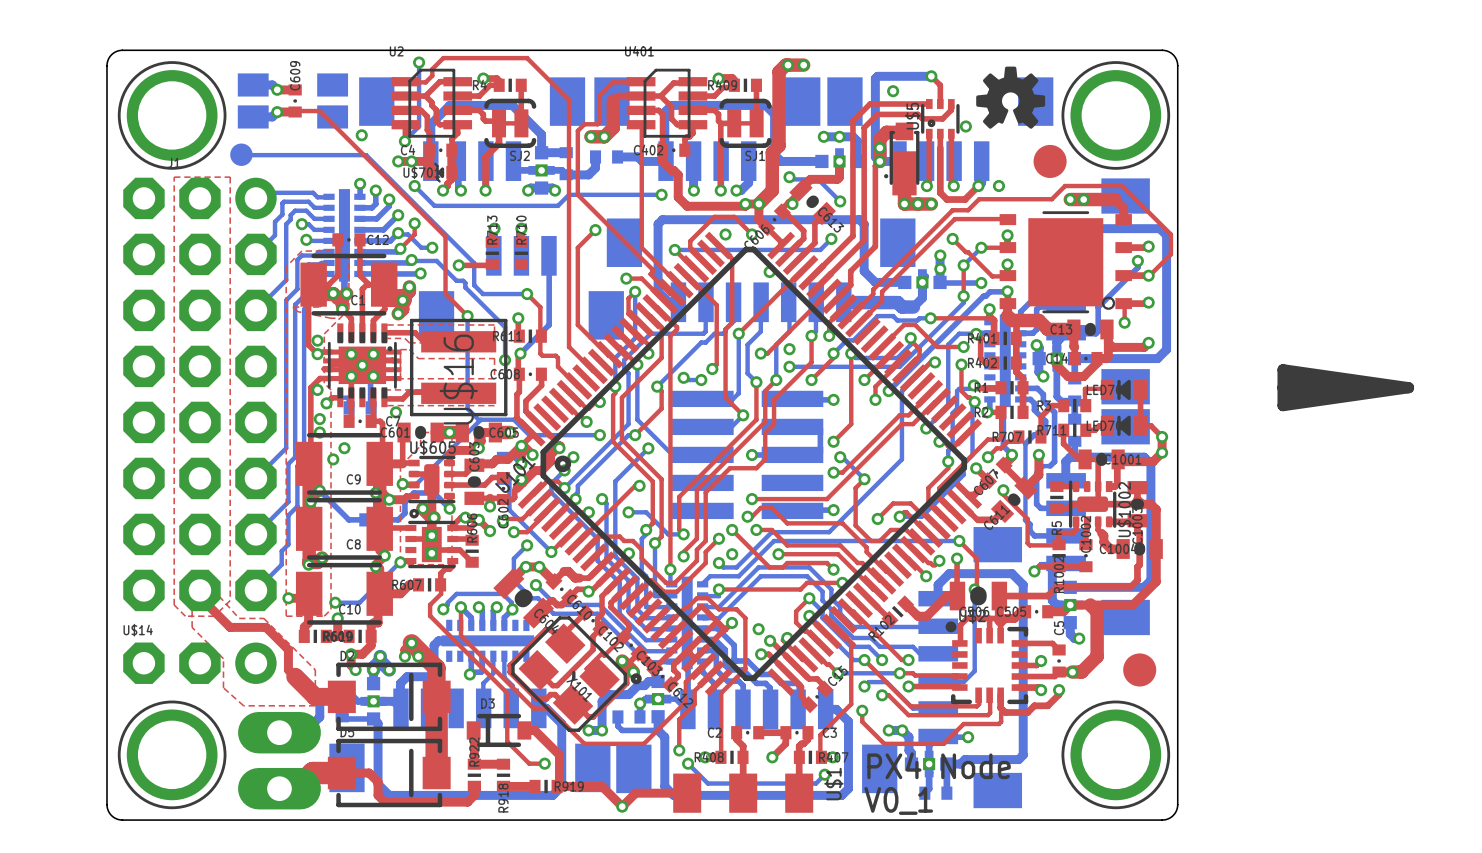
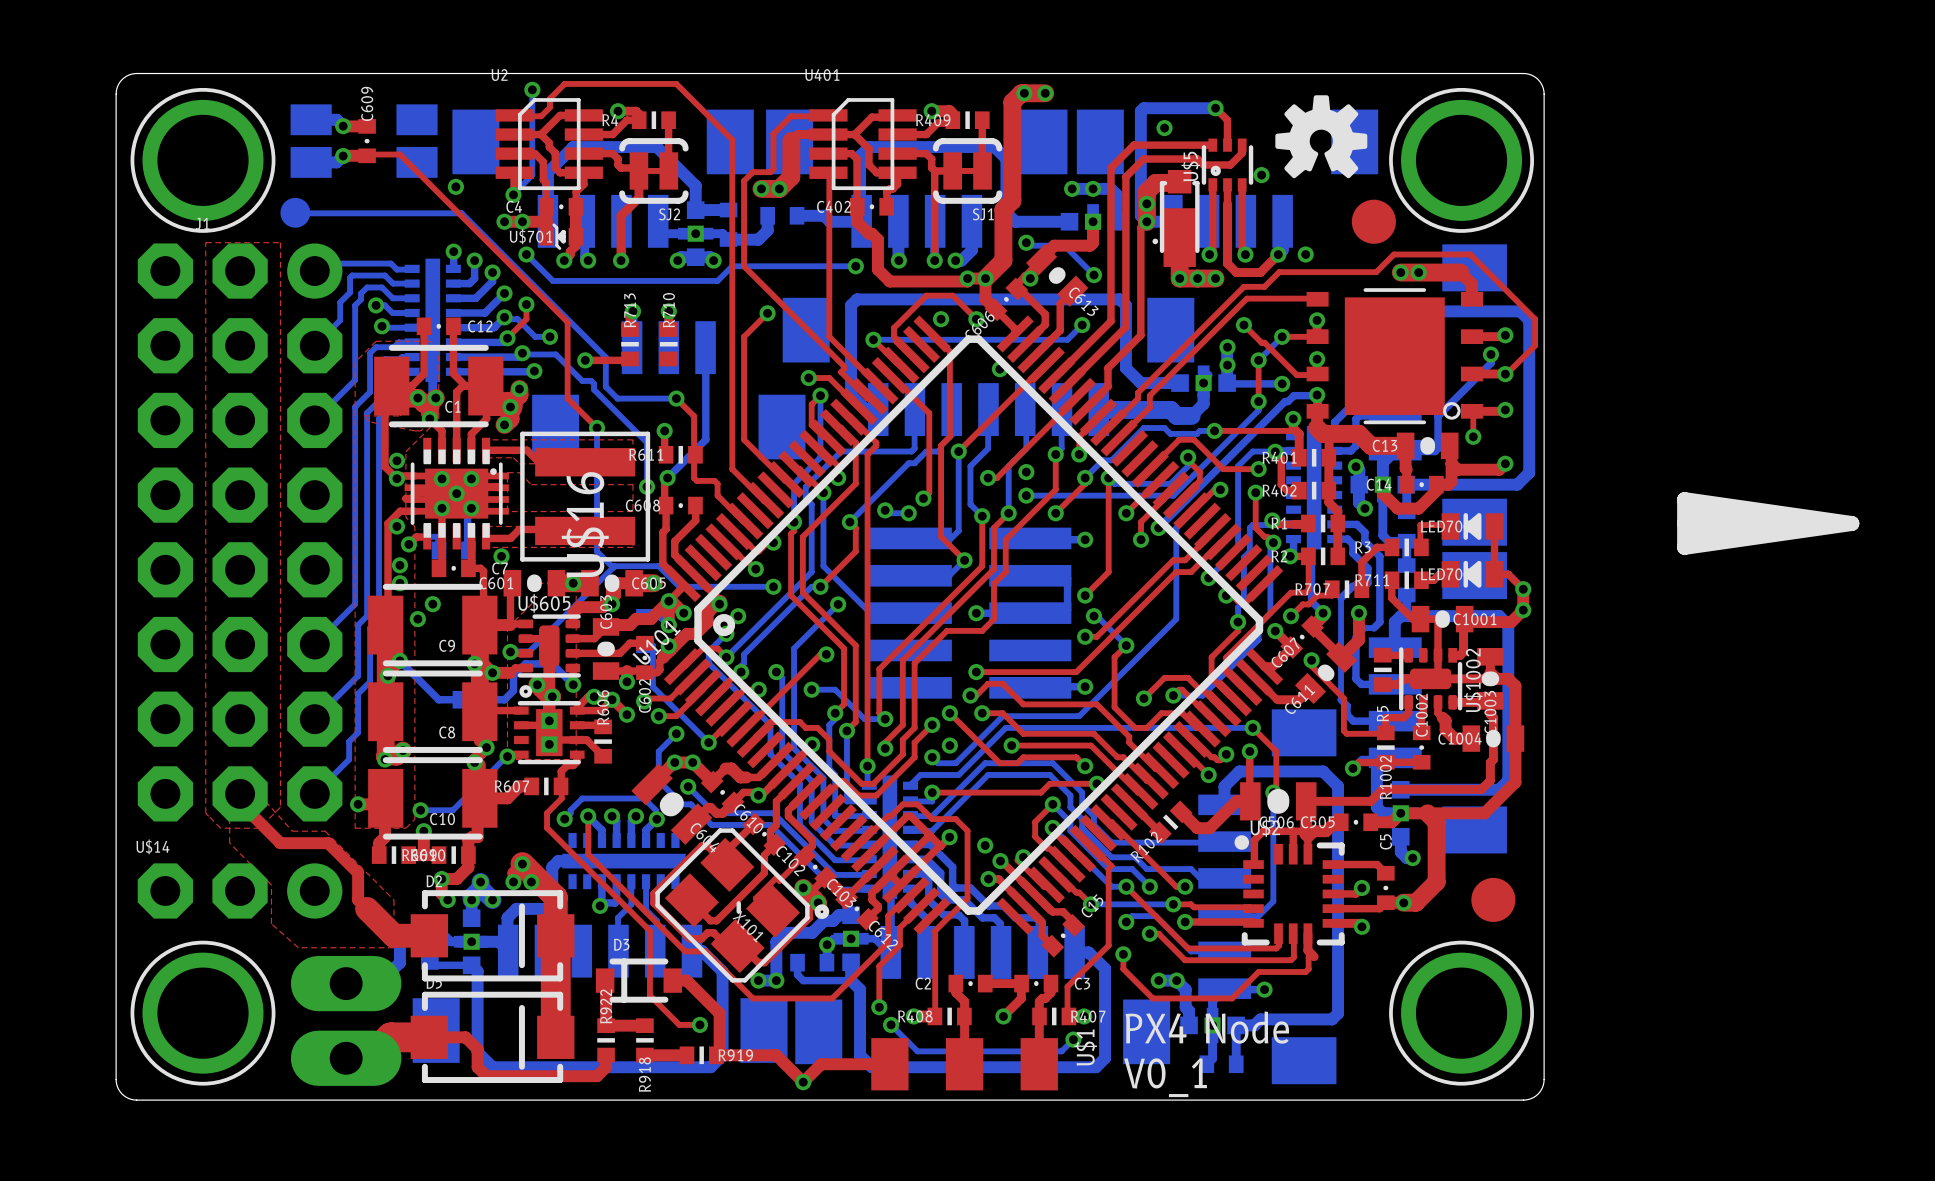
top track: (1059, 690) (1059, 694) (1047, 705) (1034, 705) (1027, 712) (1005, 712) -> none
via: (1059, 690) -> none

